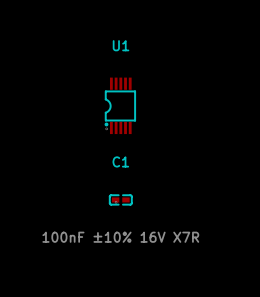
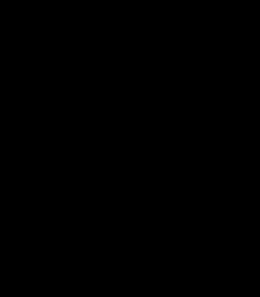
U1: (120, 105) -> none
C1: 100nF ±10% 16V X7R (120, 199) -> none

